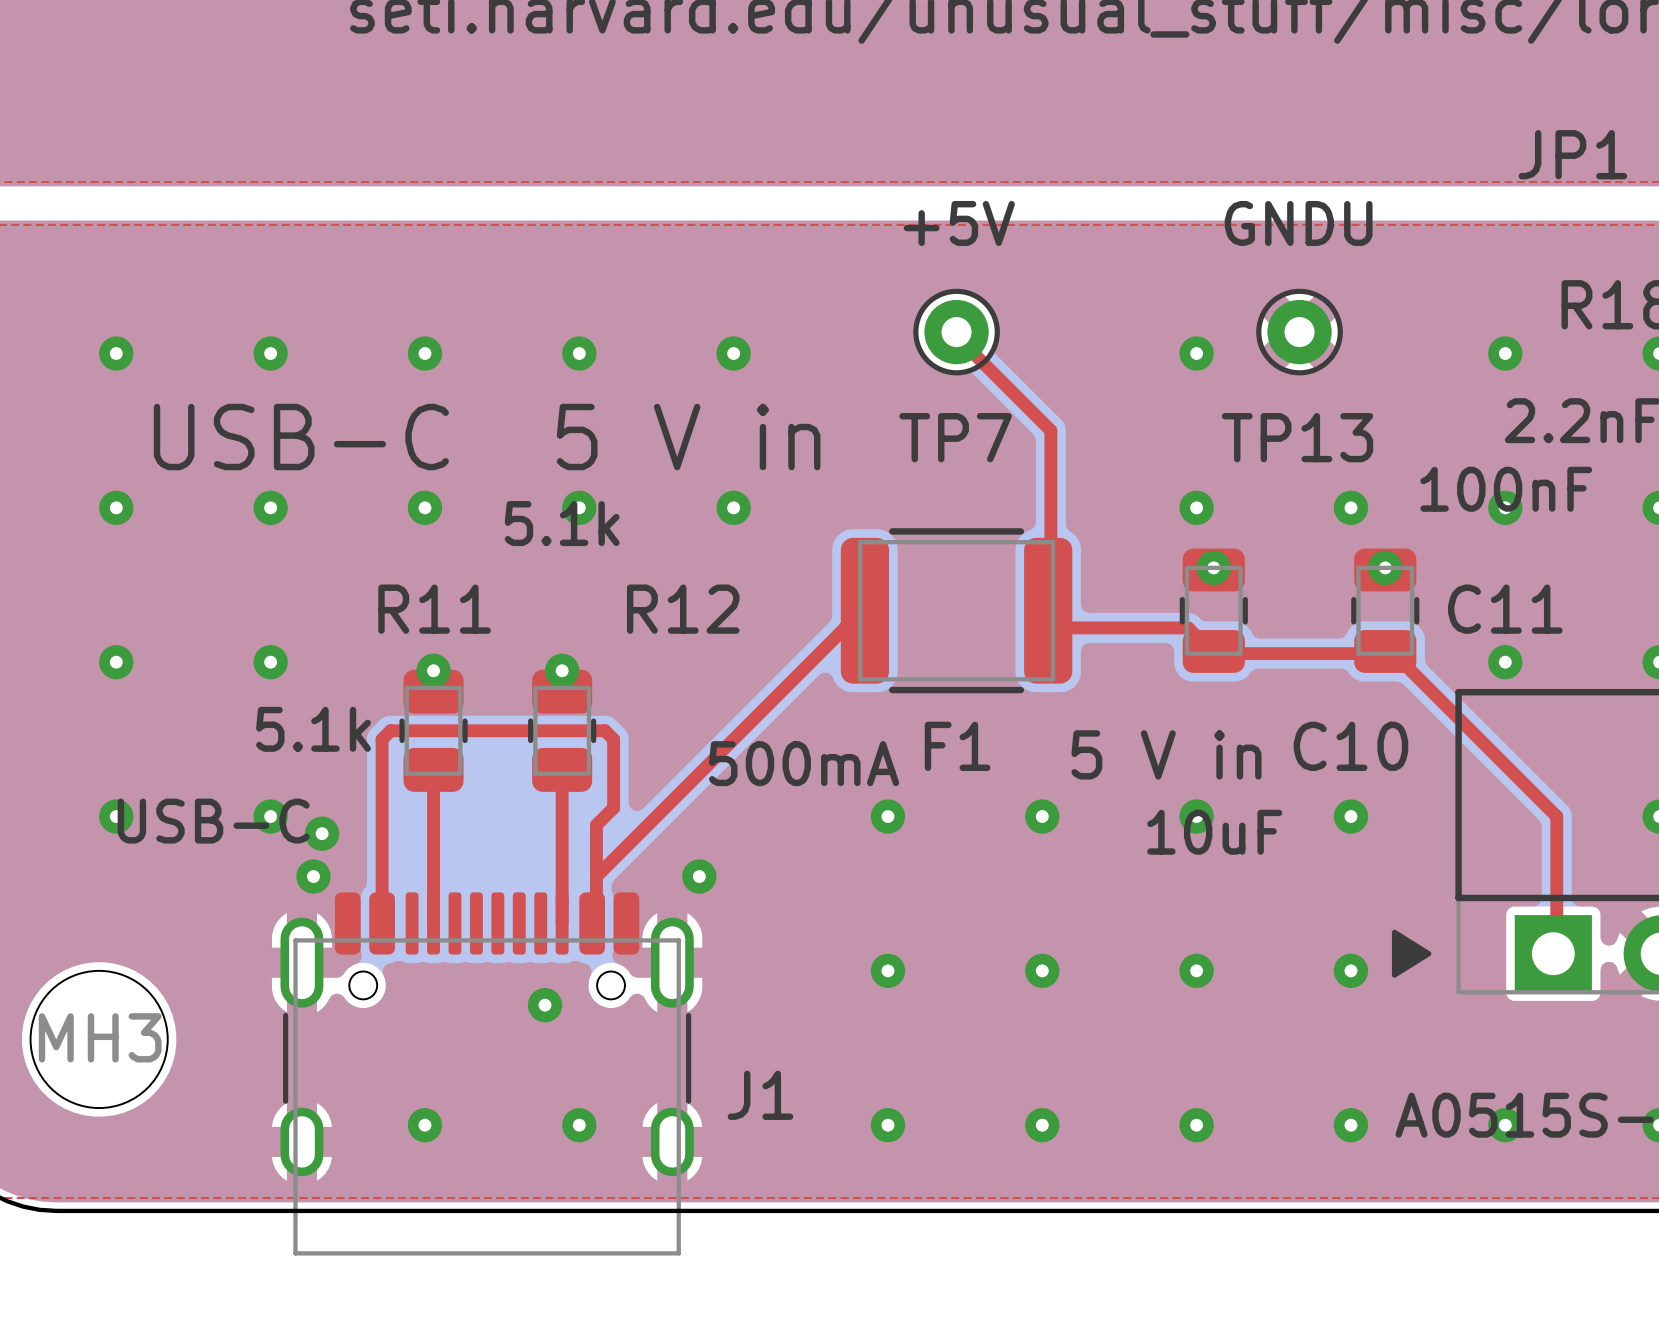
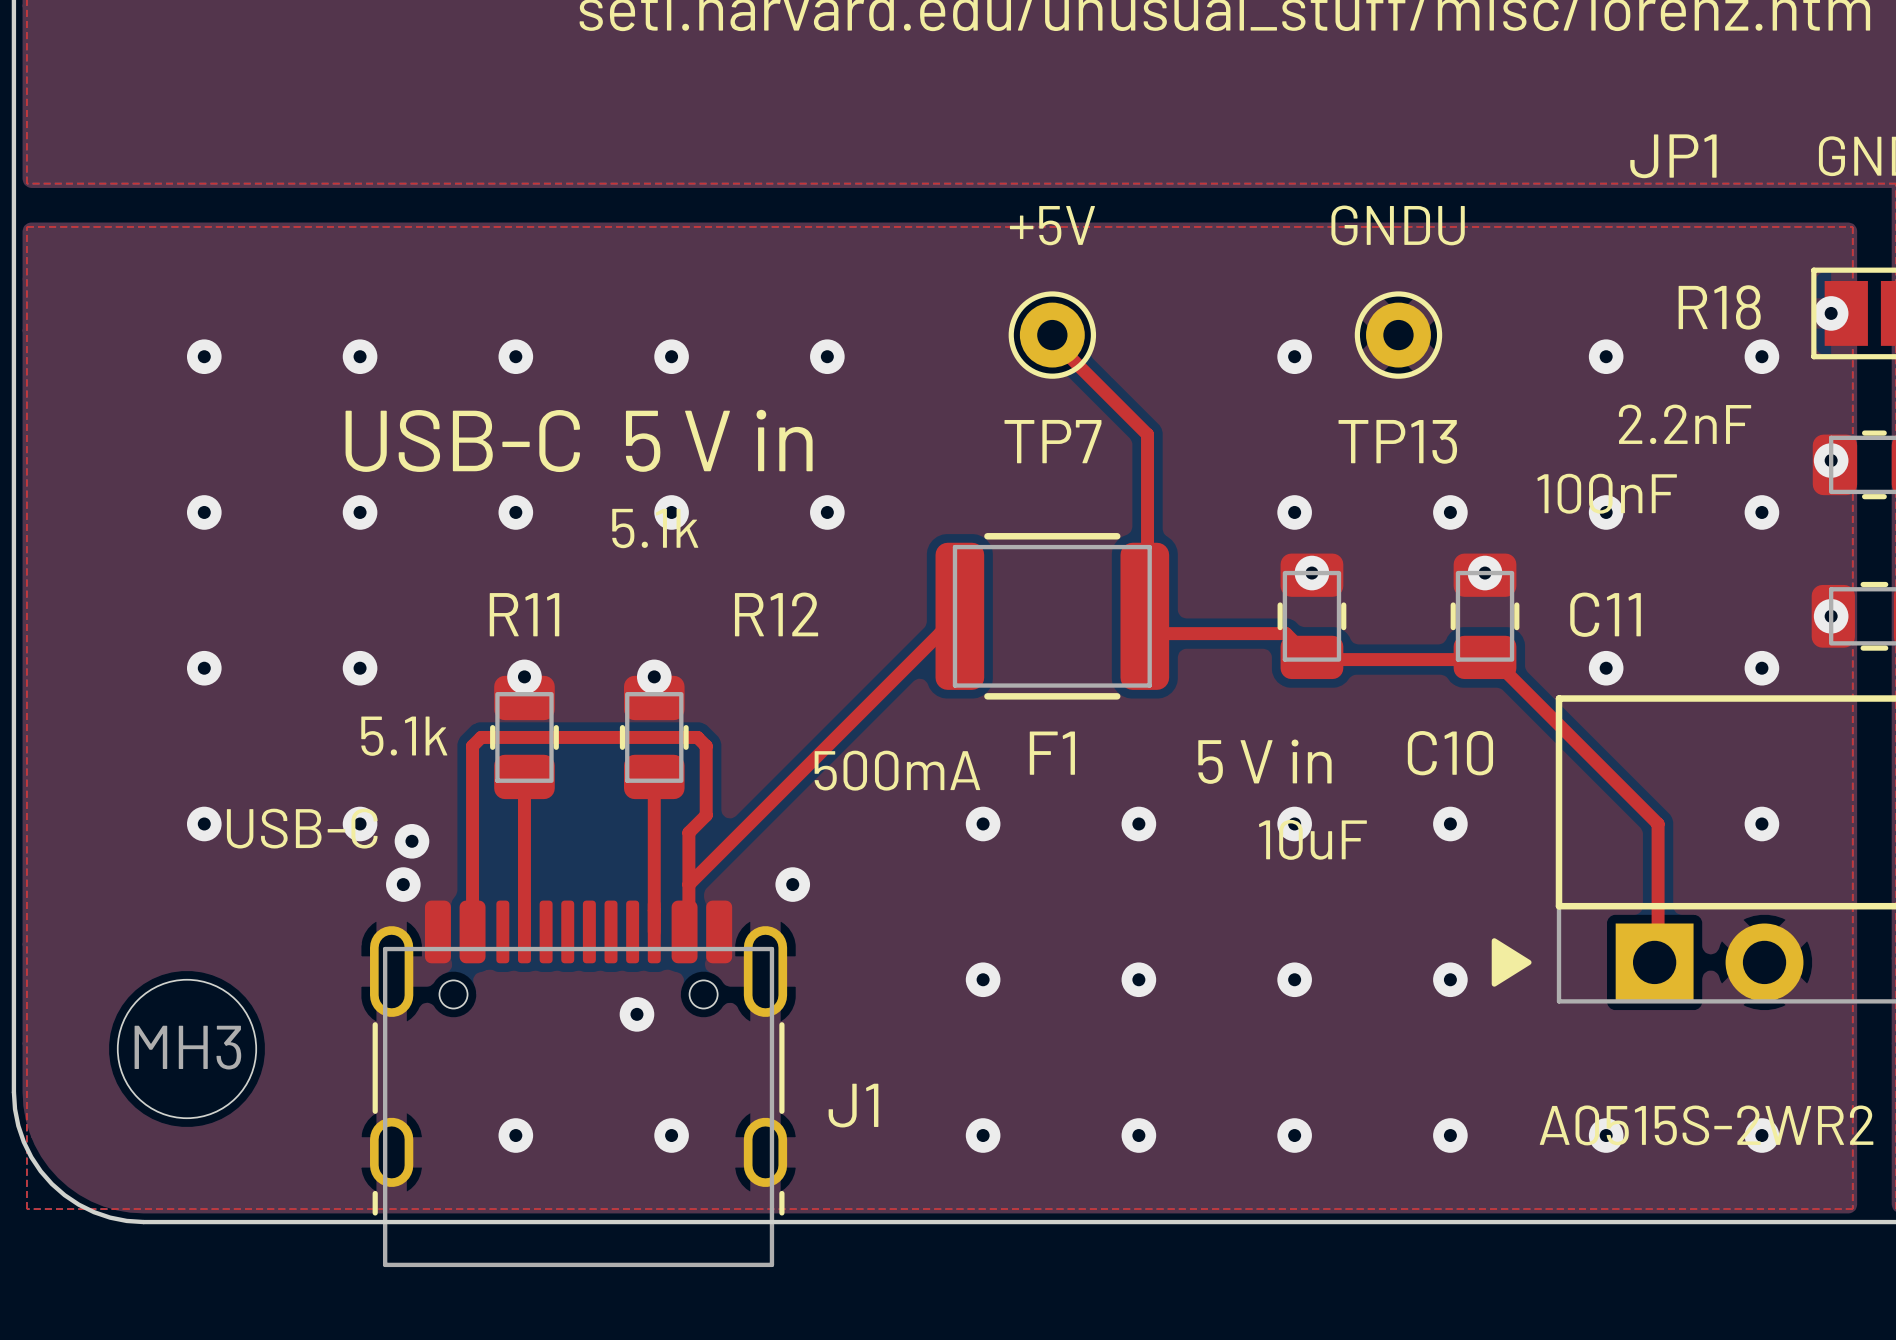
J1 footprint: [280, 892, 694, 1256] -> [370, 900, 788, 1268]

